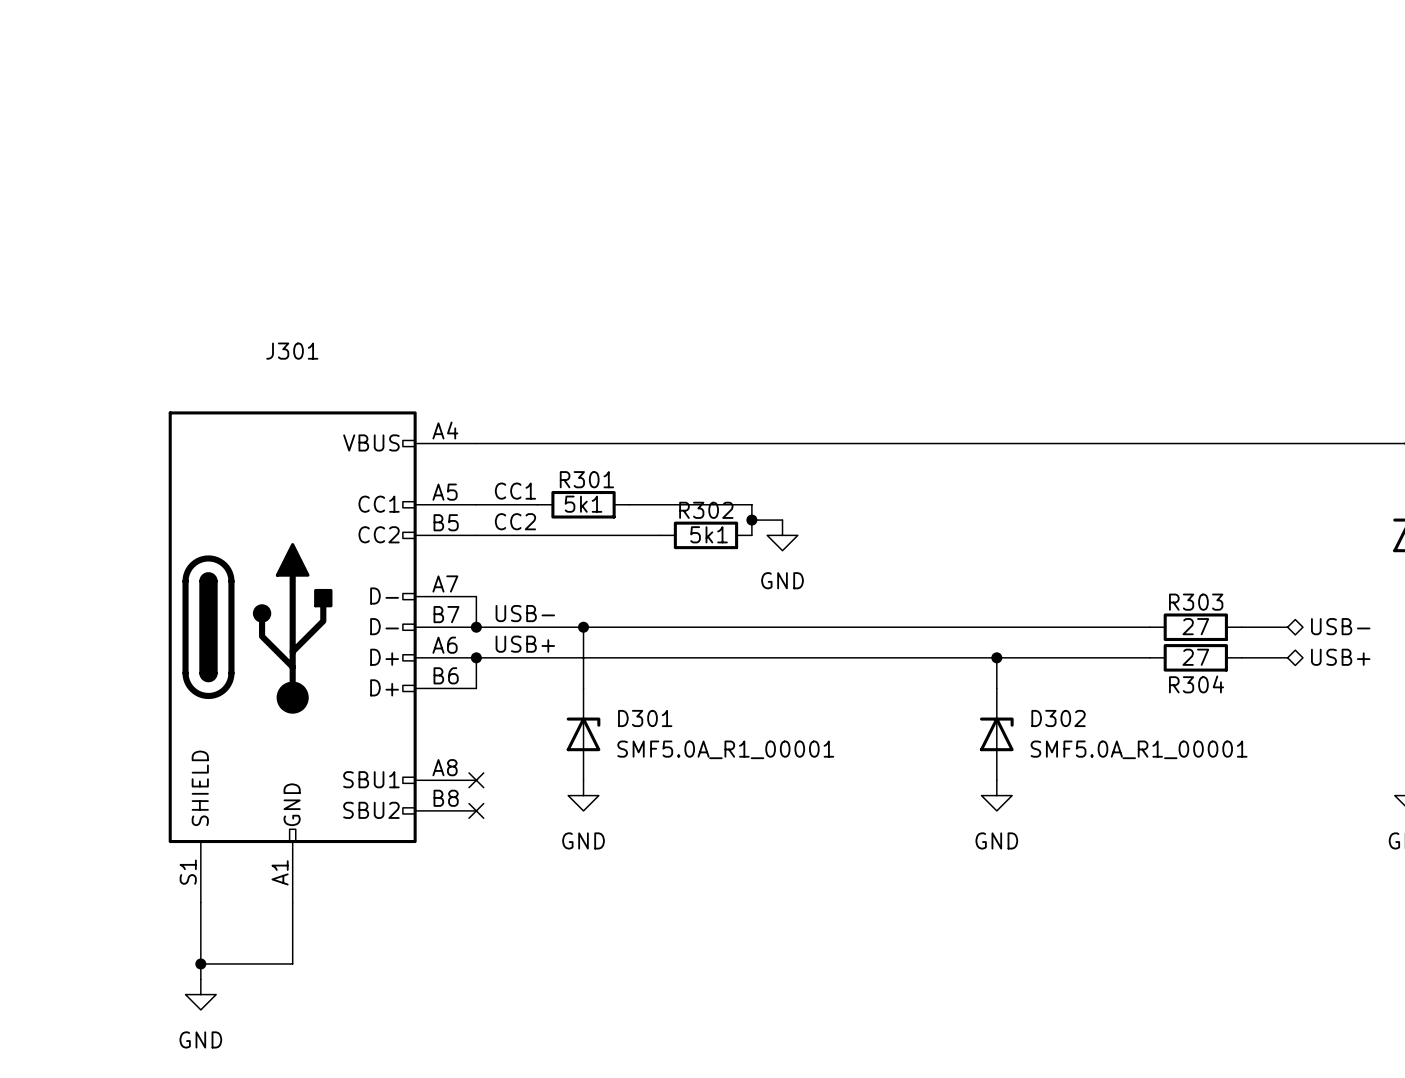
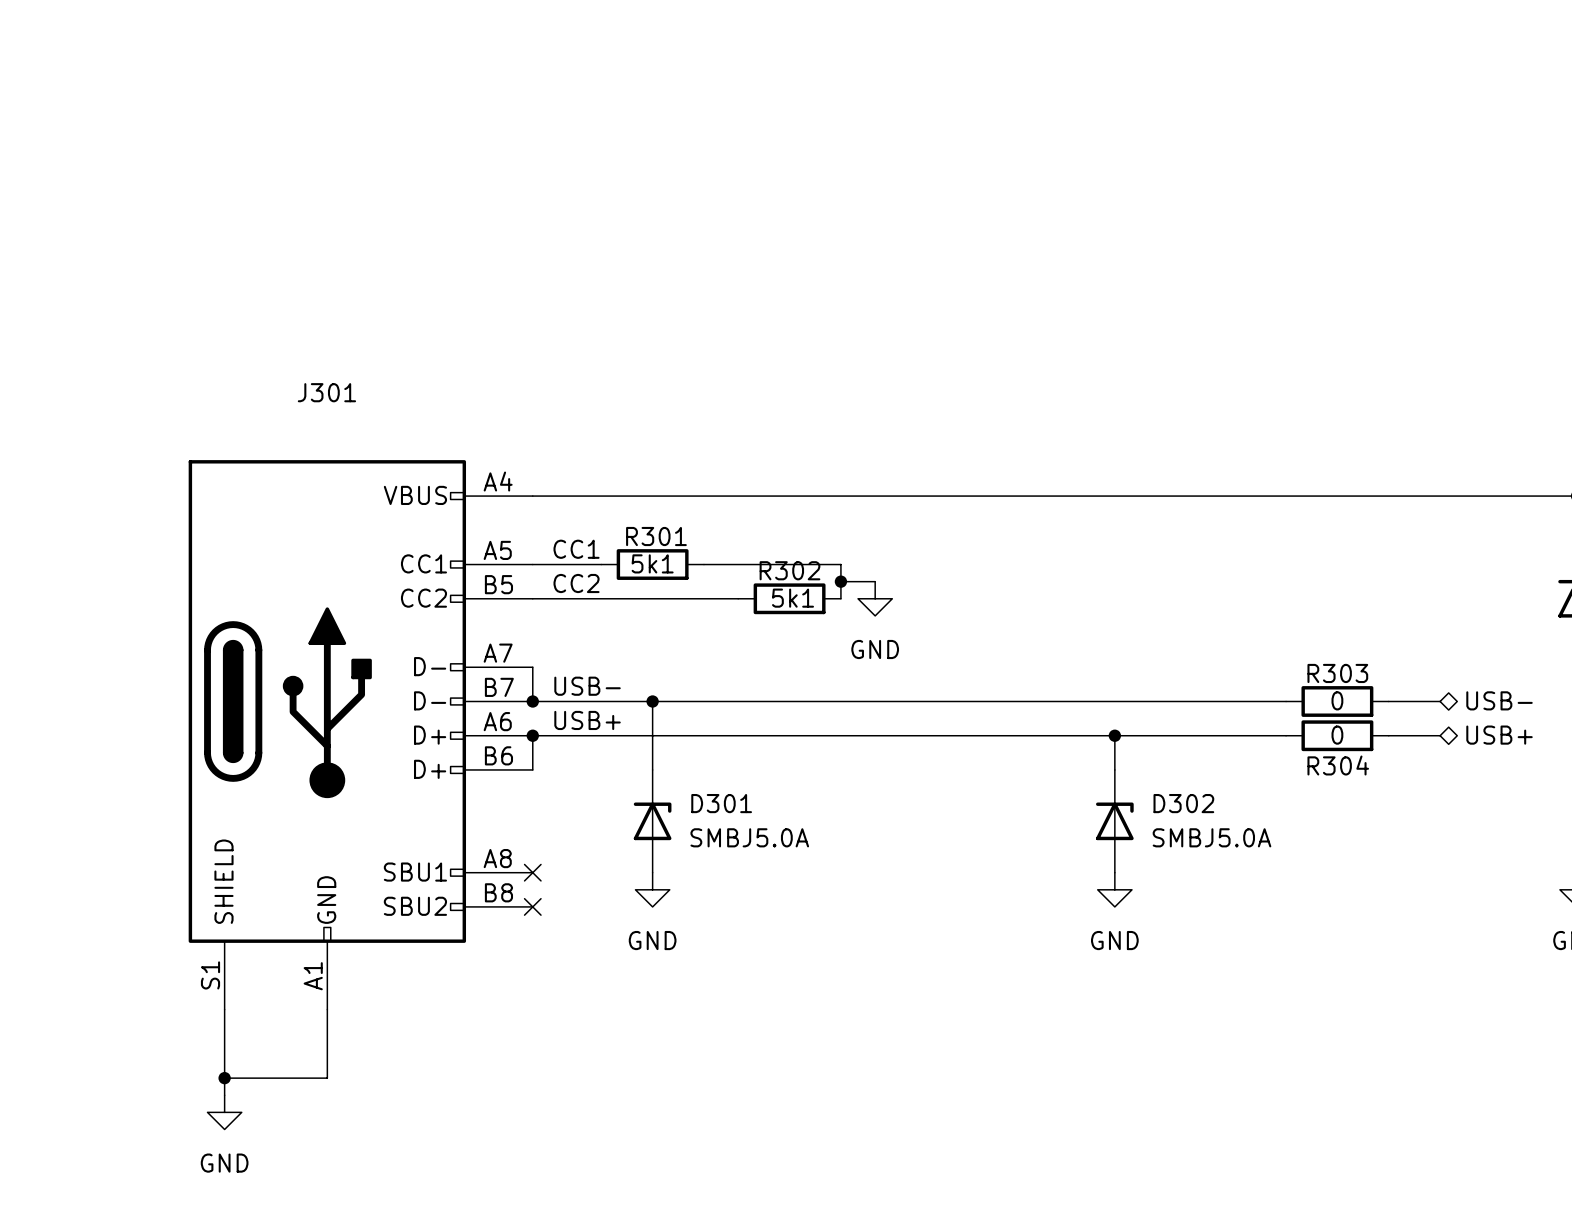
R303 value: 27 (1195, 626) -> 0 (1337, 700)
R304 value: 27 (1195, 657) -> 0 (1337, 735)
D301 value: SMF5.0A_R1_00001 (725, 749) -> SMBJ5.0A (749, 837)
D302 value: SMF5.0A_R1_00001 (1139, 749) -> SMBJ5.0A (1212, 837)

